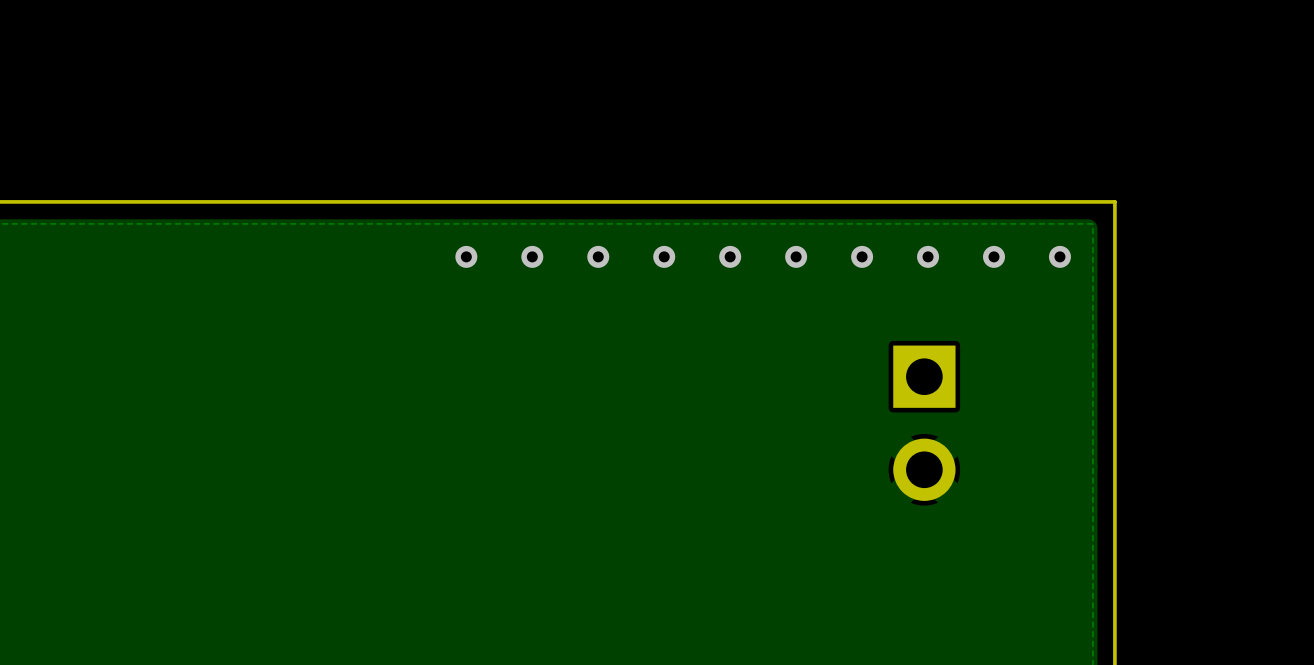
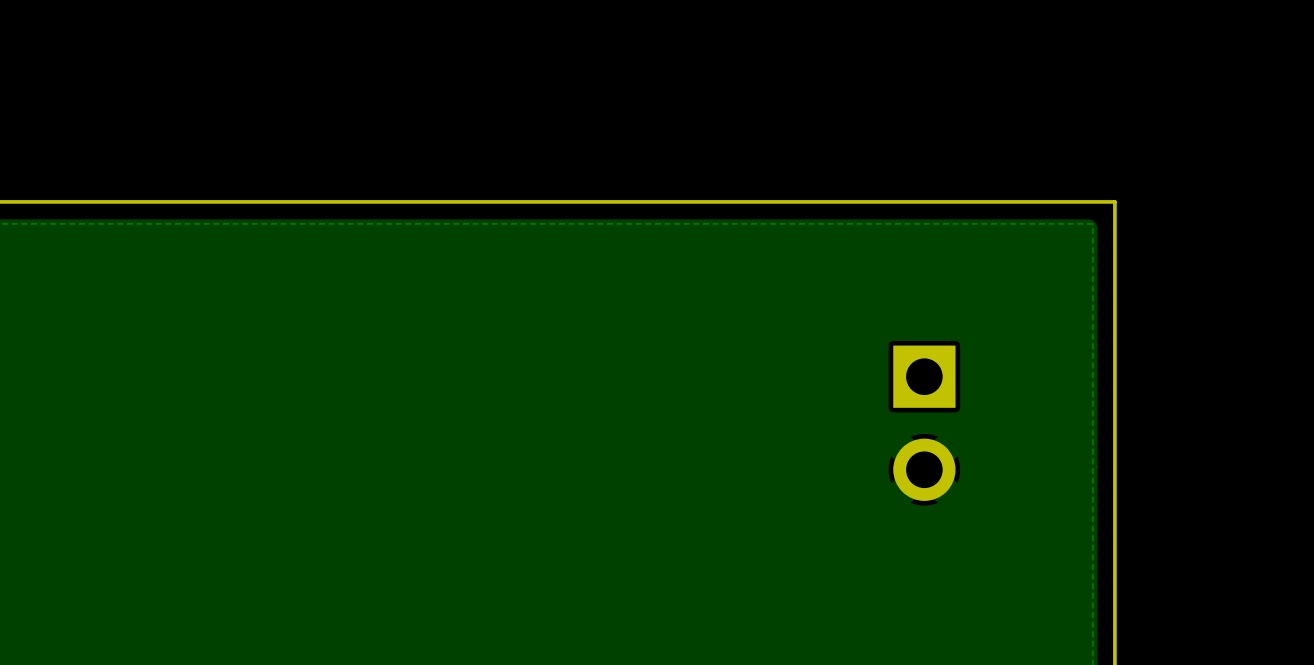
via: (466, 256) -> none
via: (532, 256) -> none
via: (598, 256) -> none
via: (664, 256) -> none
via: (730, 256) -> none
via: (796, 256) -> none
via: (862, 256) -> none
via: (928, 256) -> none
via: (994, 256) -> none
via: (1059, 256) -> none

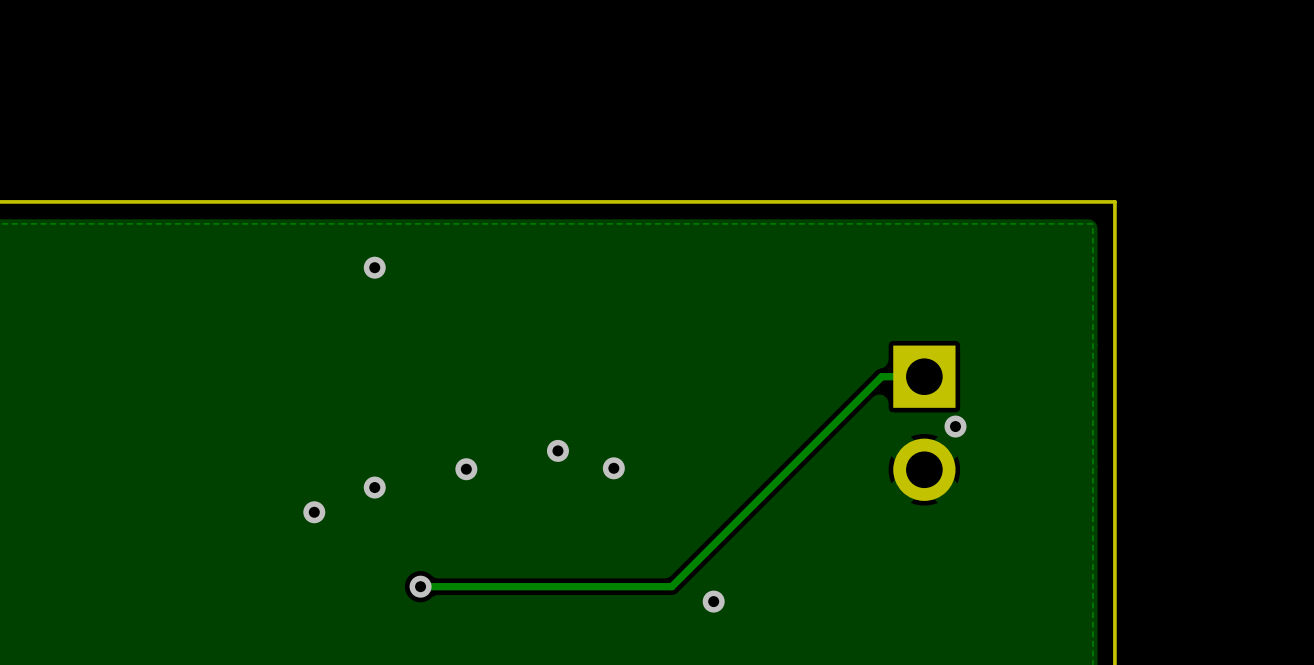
via: none -> (374, 267)
track: none -> (924, 376) (881, 376) (671, 586) (420, 586)
via: none -> (955, 426)
via: none -> (557, 450)
via: none -> (613, 468)
via: none -> (466, 469)
via: none -> (374, 487)
via: none -> (314, 512)
via: none -> (420, 586)
via: none -> (713, 601)

